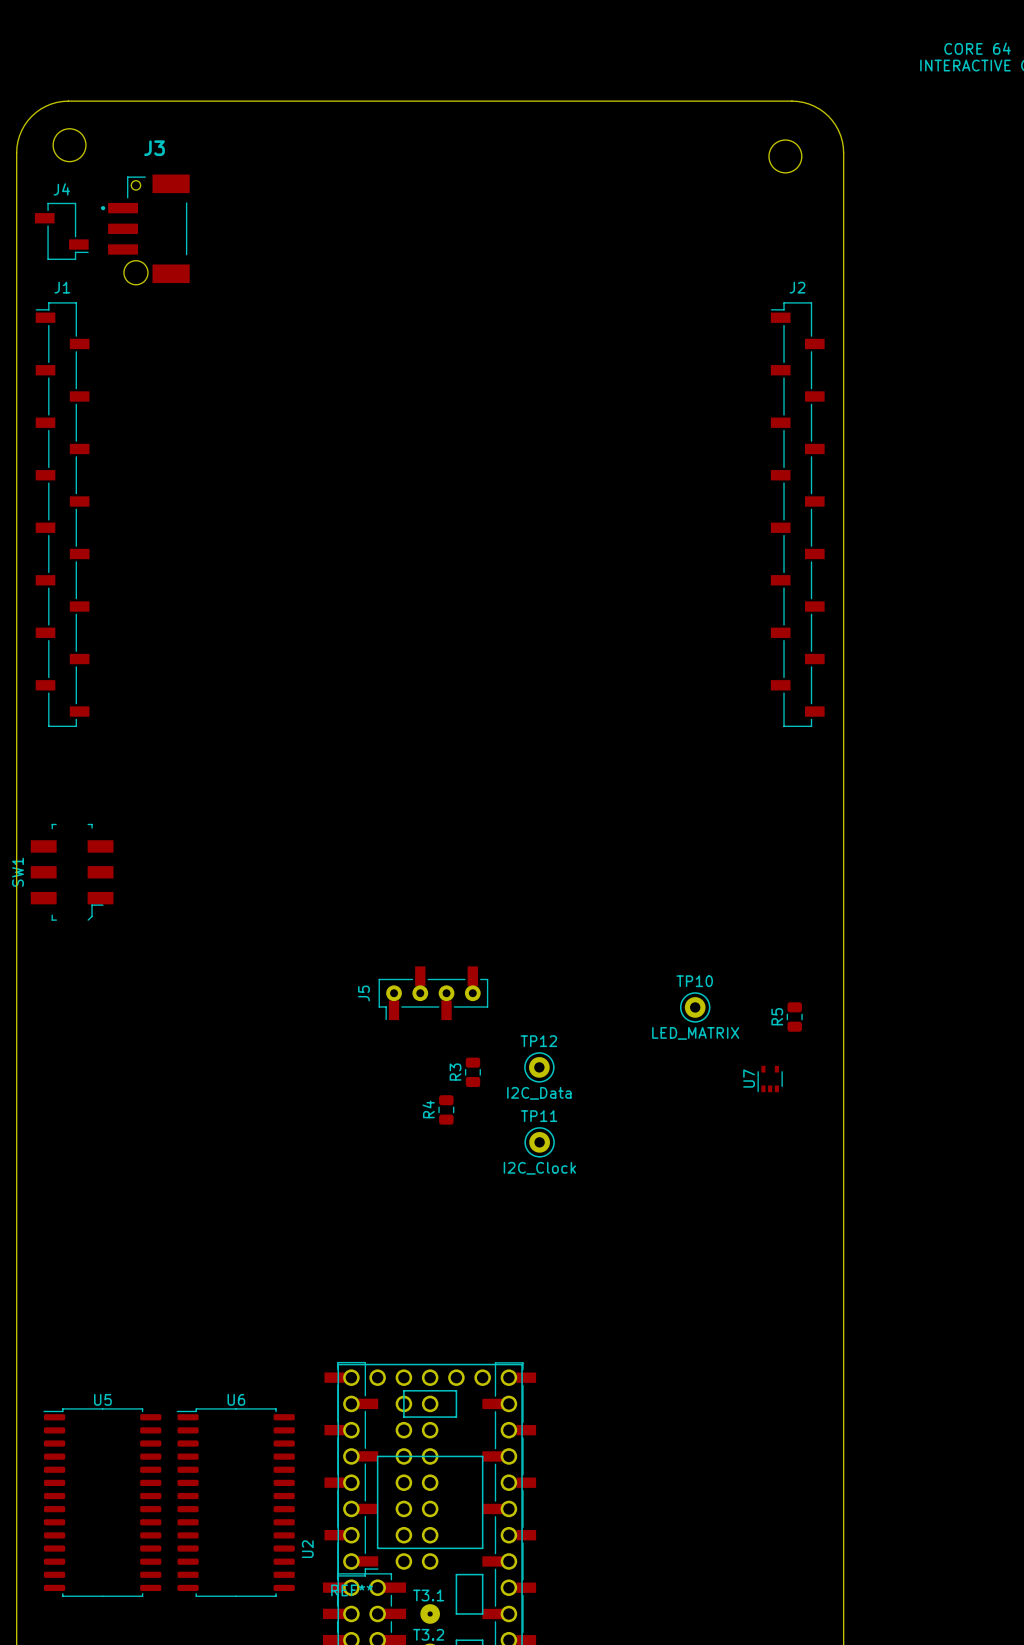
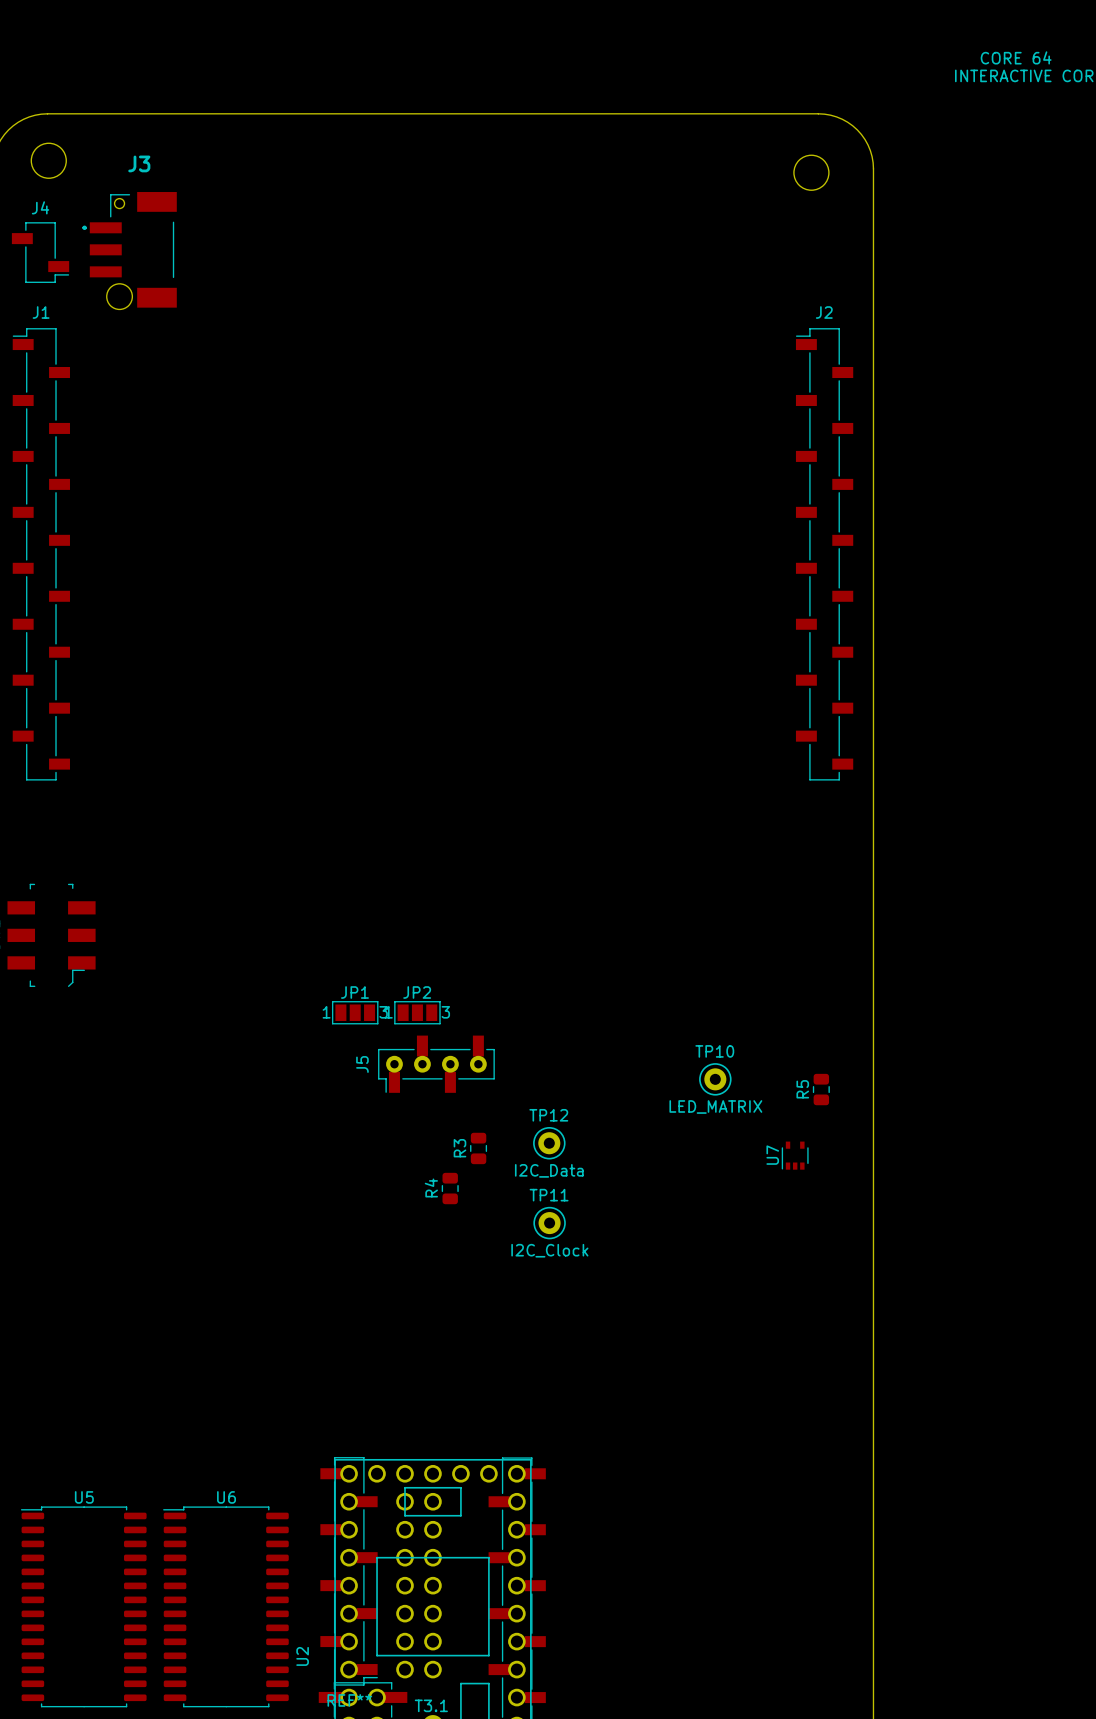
JP1: none -> (355, 1012)
JP2: none -> (417, 1012)

